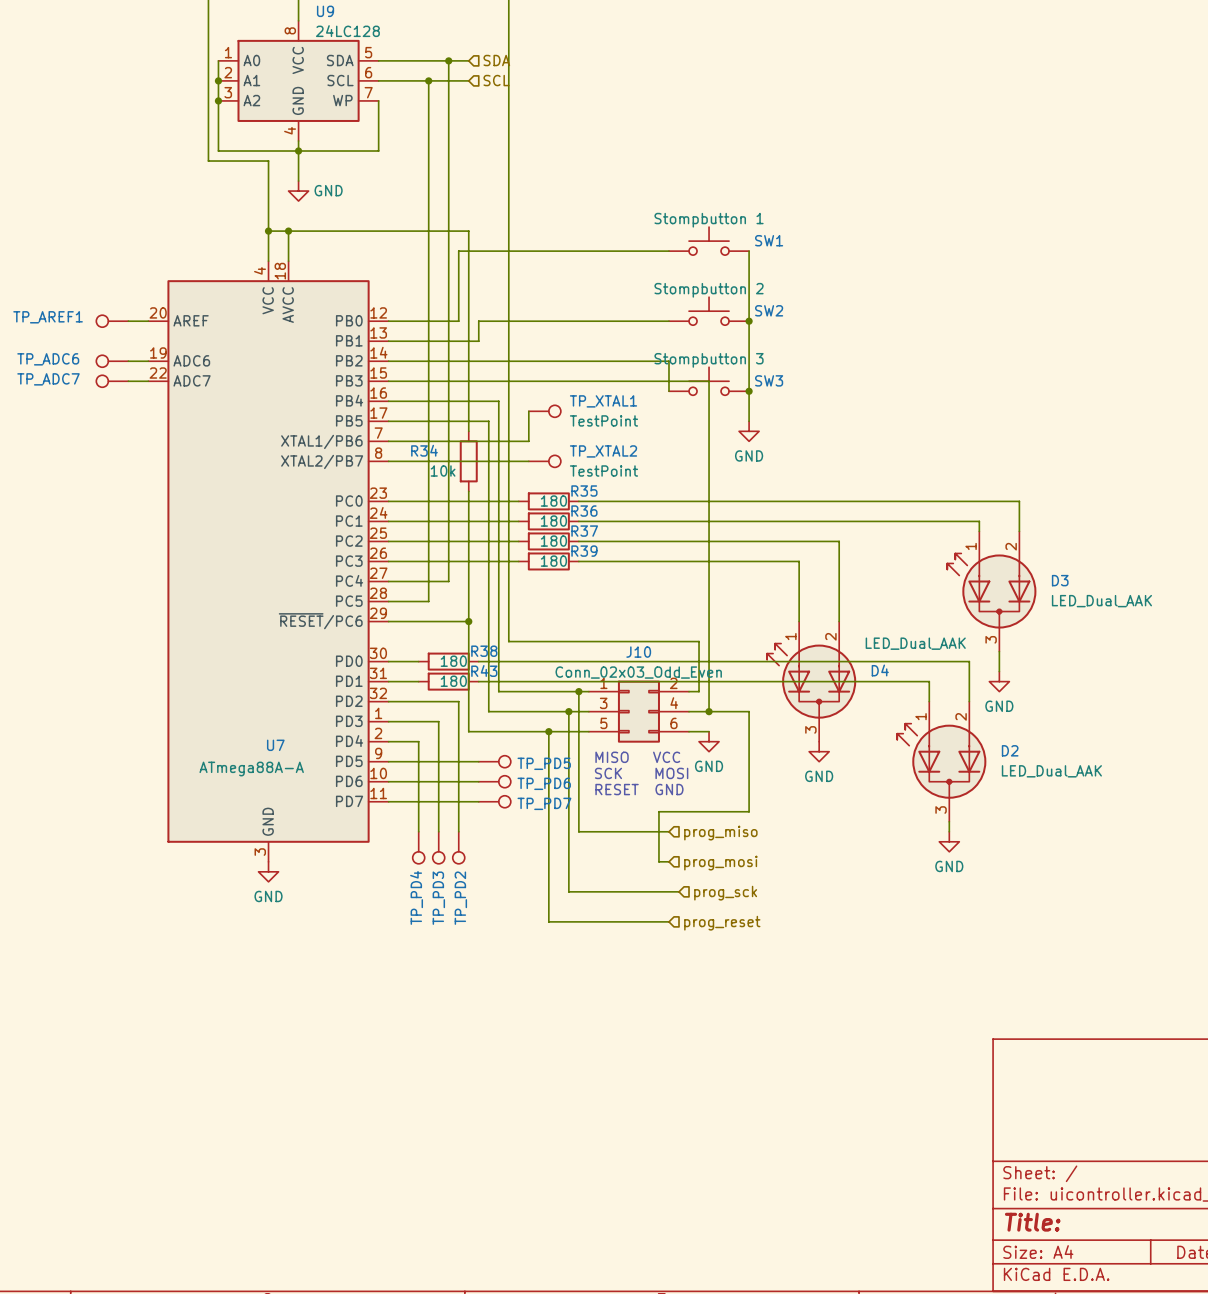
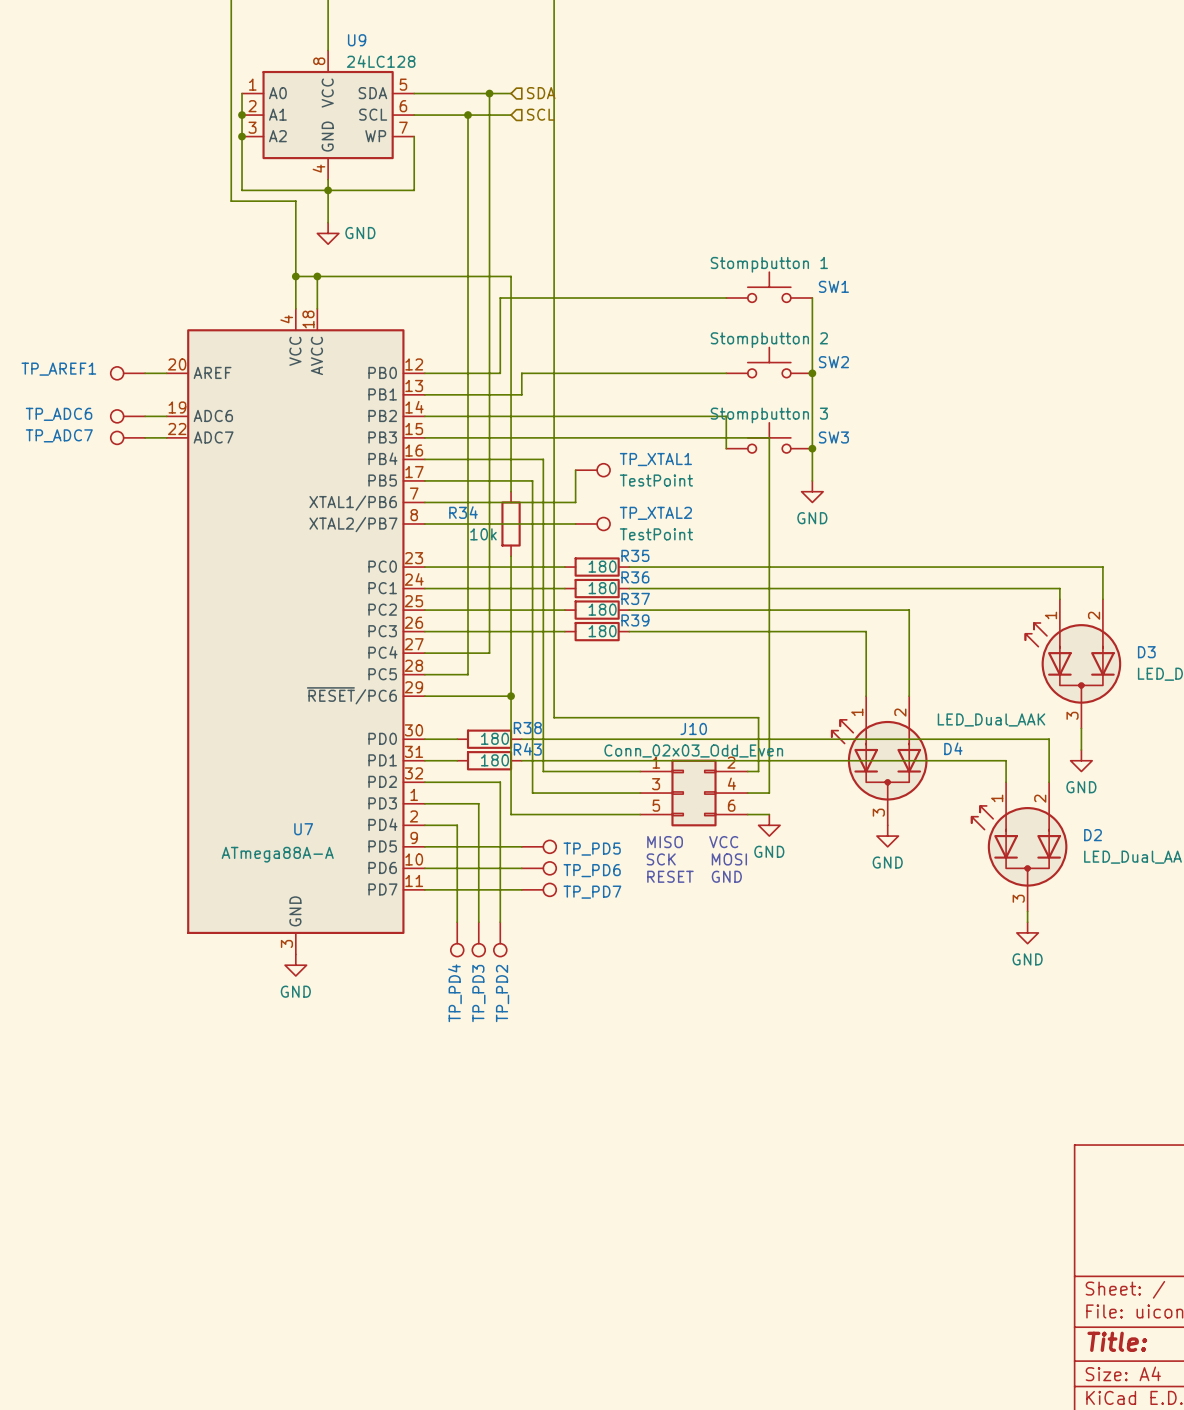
wire: (578, 691) (578, 831) (668, 831) -> none
junction: (578, 691) -> none
wire: (568, 711) (568, 891) (679, 891) -> none
junction: (568, 711) -> none
wire: (709, 711) (749, 711) (749, 811) (658, 811) (658, 861) (668, 861) -> none
junction: (709, 711) -> none
wire: (548, 731) (548, 921) (668, 921) -> none
junction: (548, 731) -> none
hierarchical label: prog_miso (720, 833) -> none
hierarchical label: prog_mosi (720, 863) -> none
hierarchical label: prog_sck (725, 893) -> none
hierarchical label: prog_reset (722, 923) -> none

